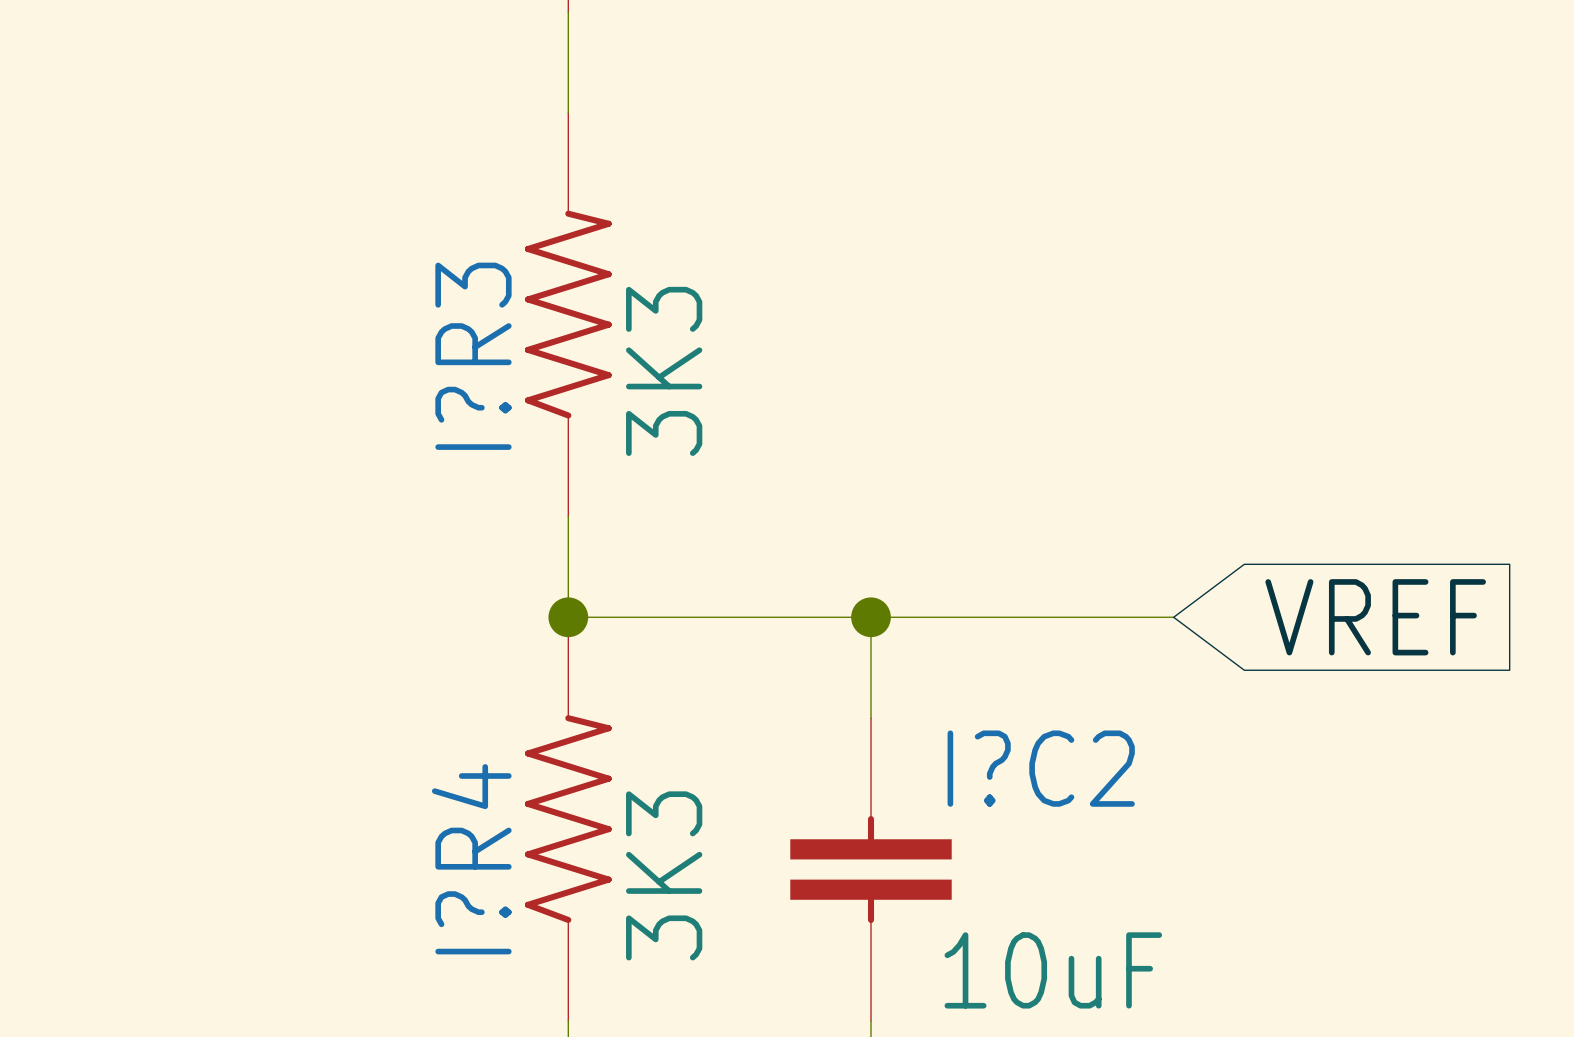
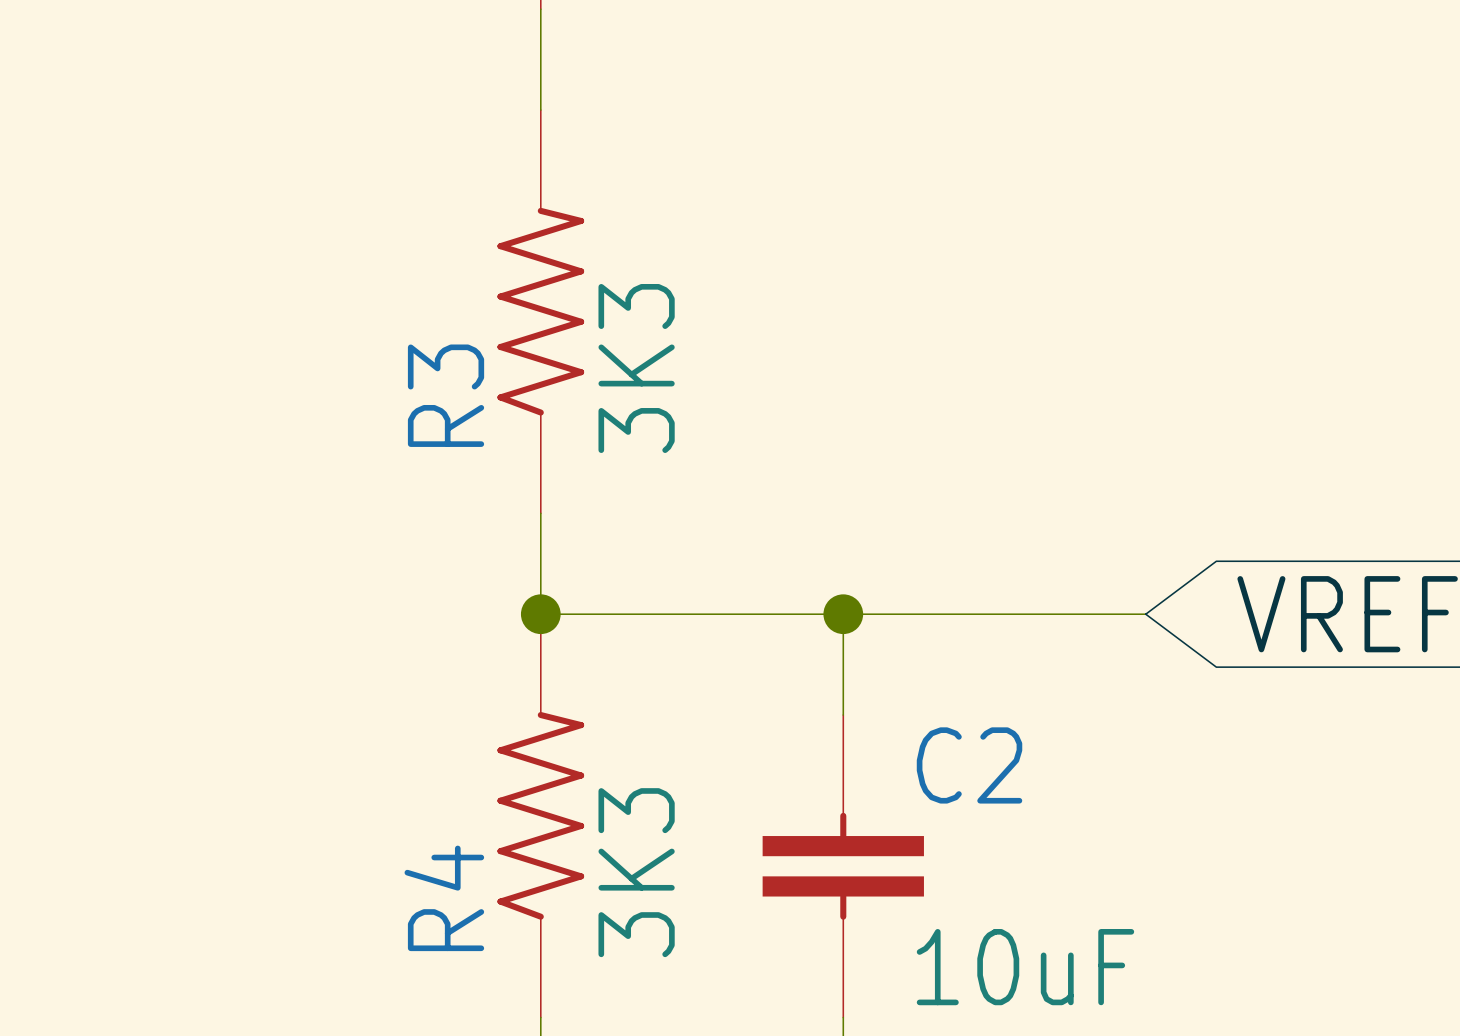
I?R3 name: I?R3 (473, 356) -> R3 (446, 395)
I?C2 name: I?C2 (1041, 768) -> C2 (969, 765)
I?R4 name: I?R4 (471, 859) -> R4 (444, 898)

